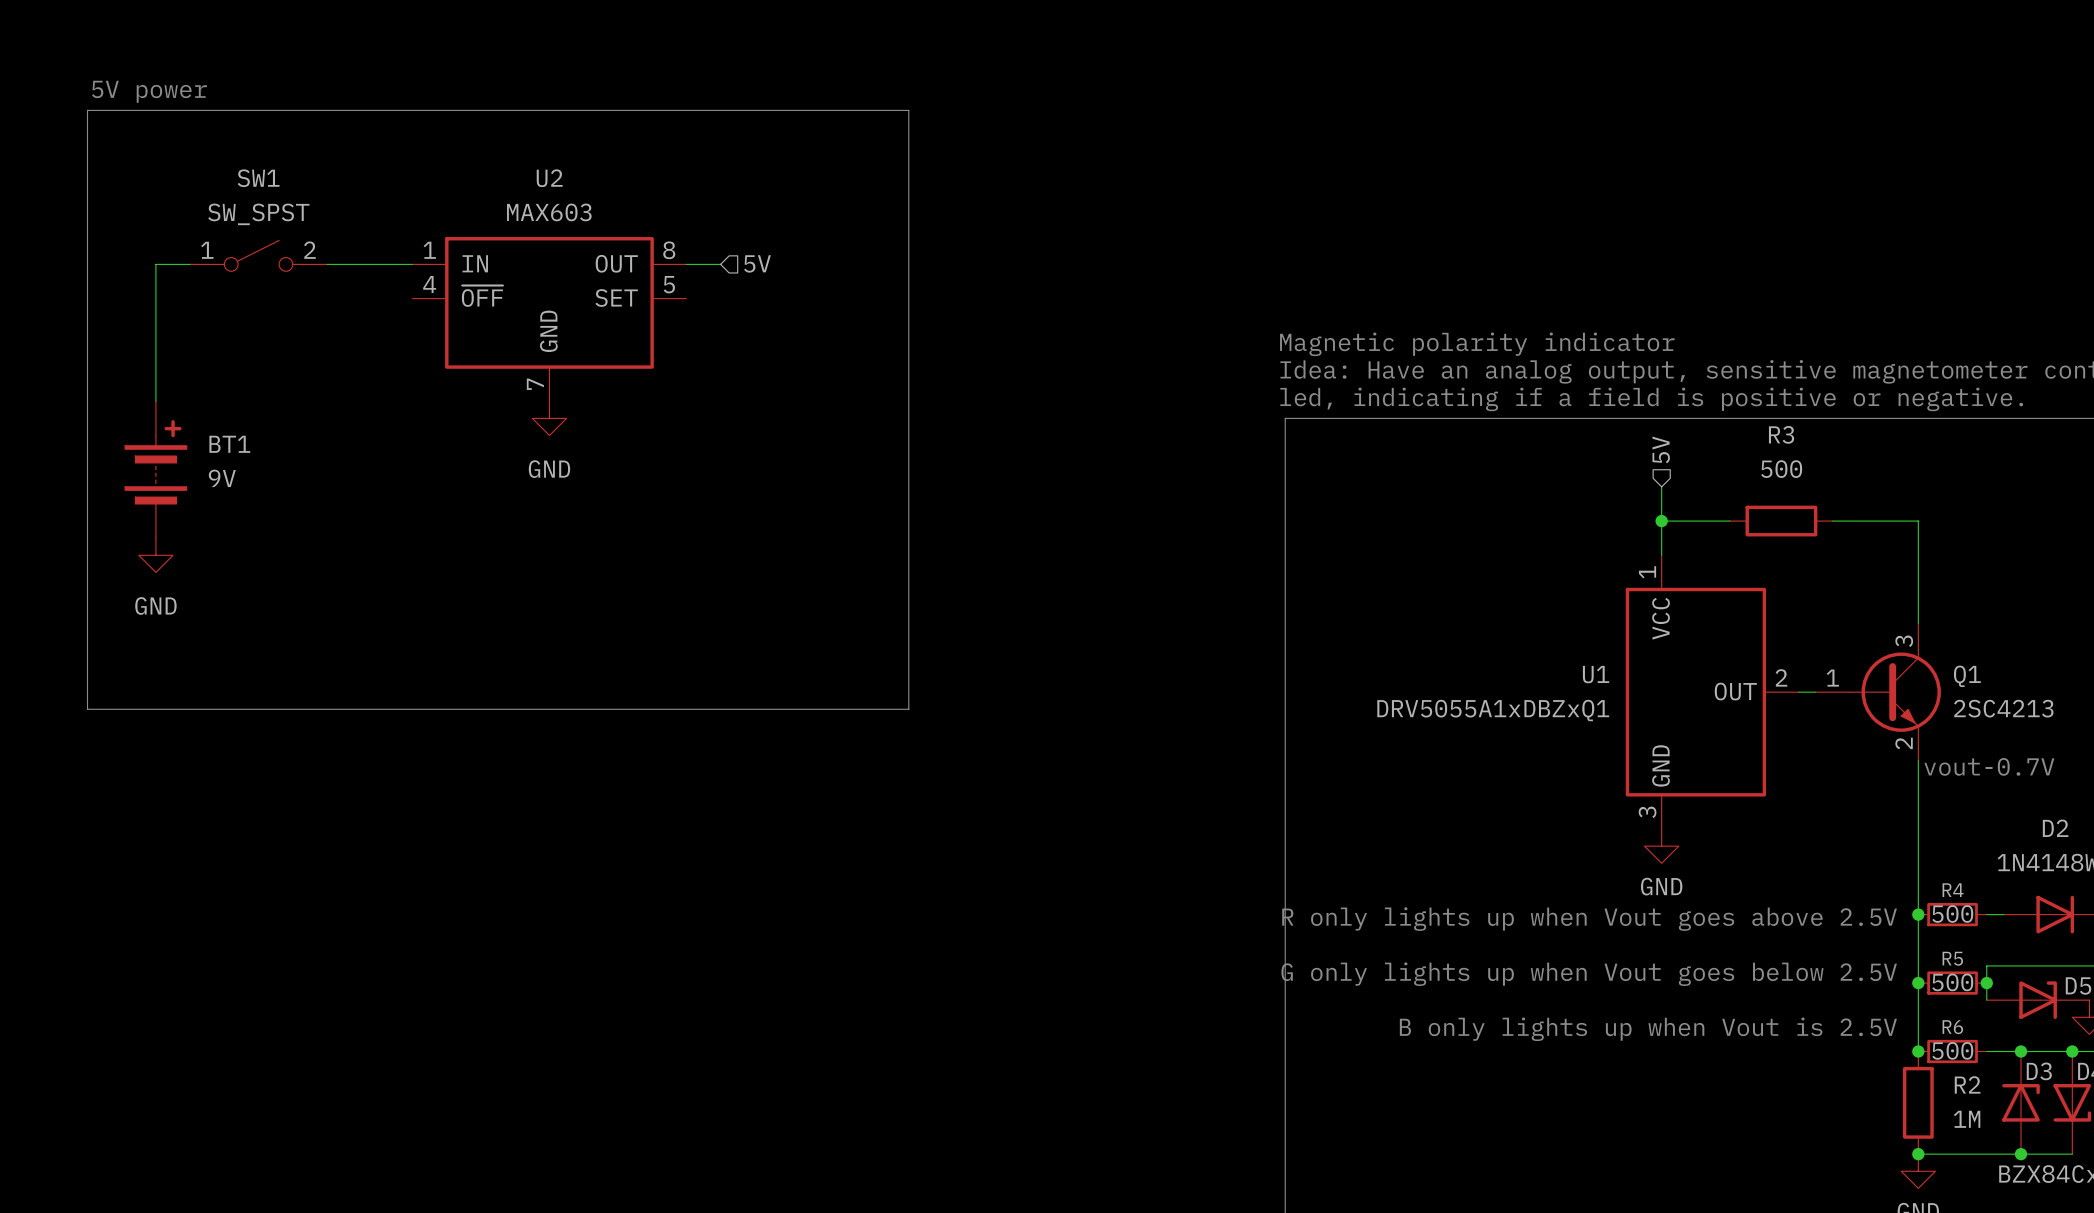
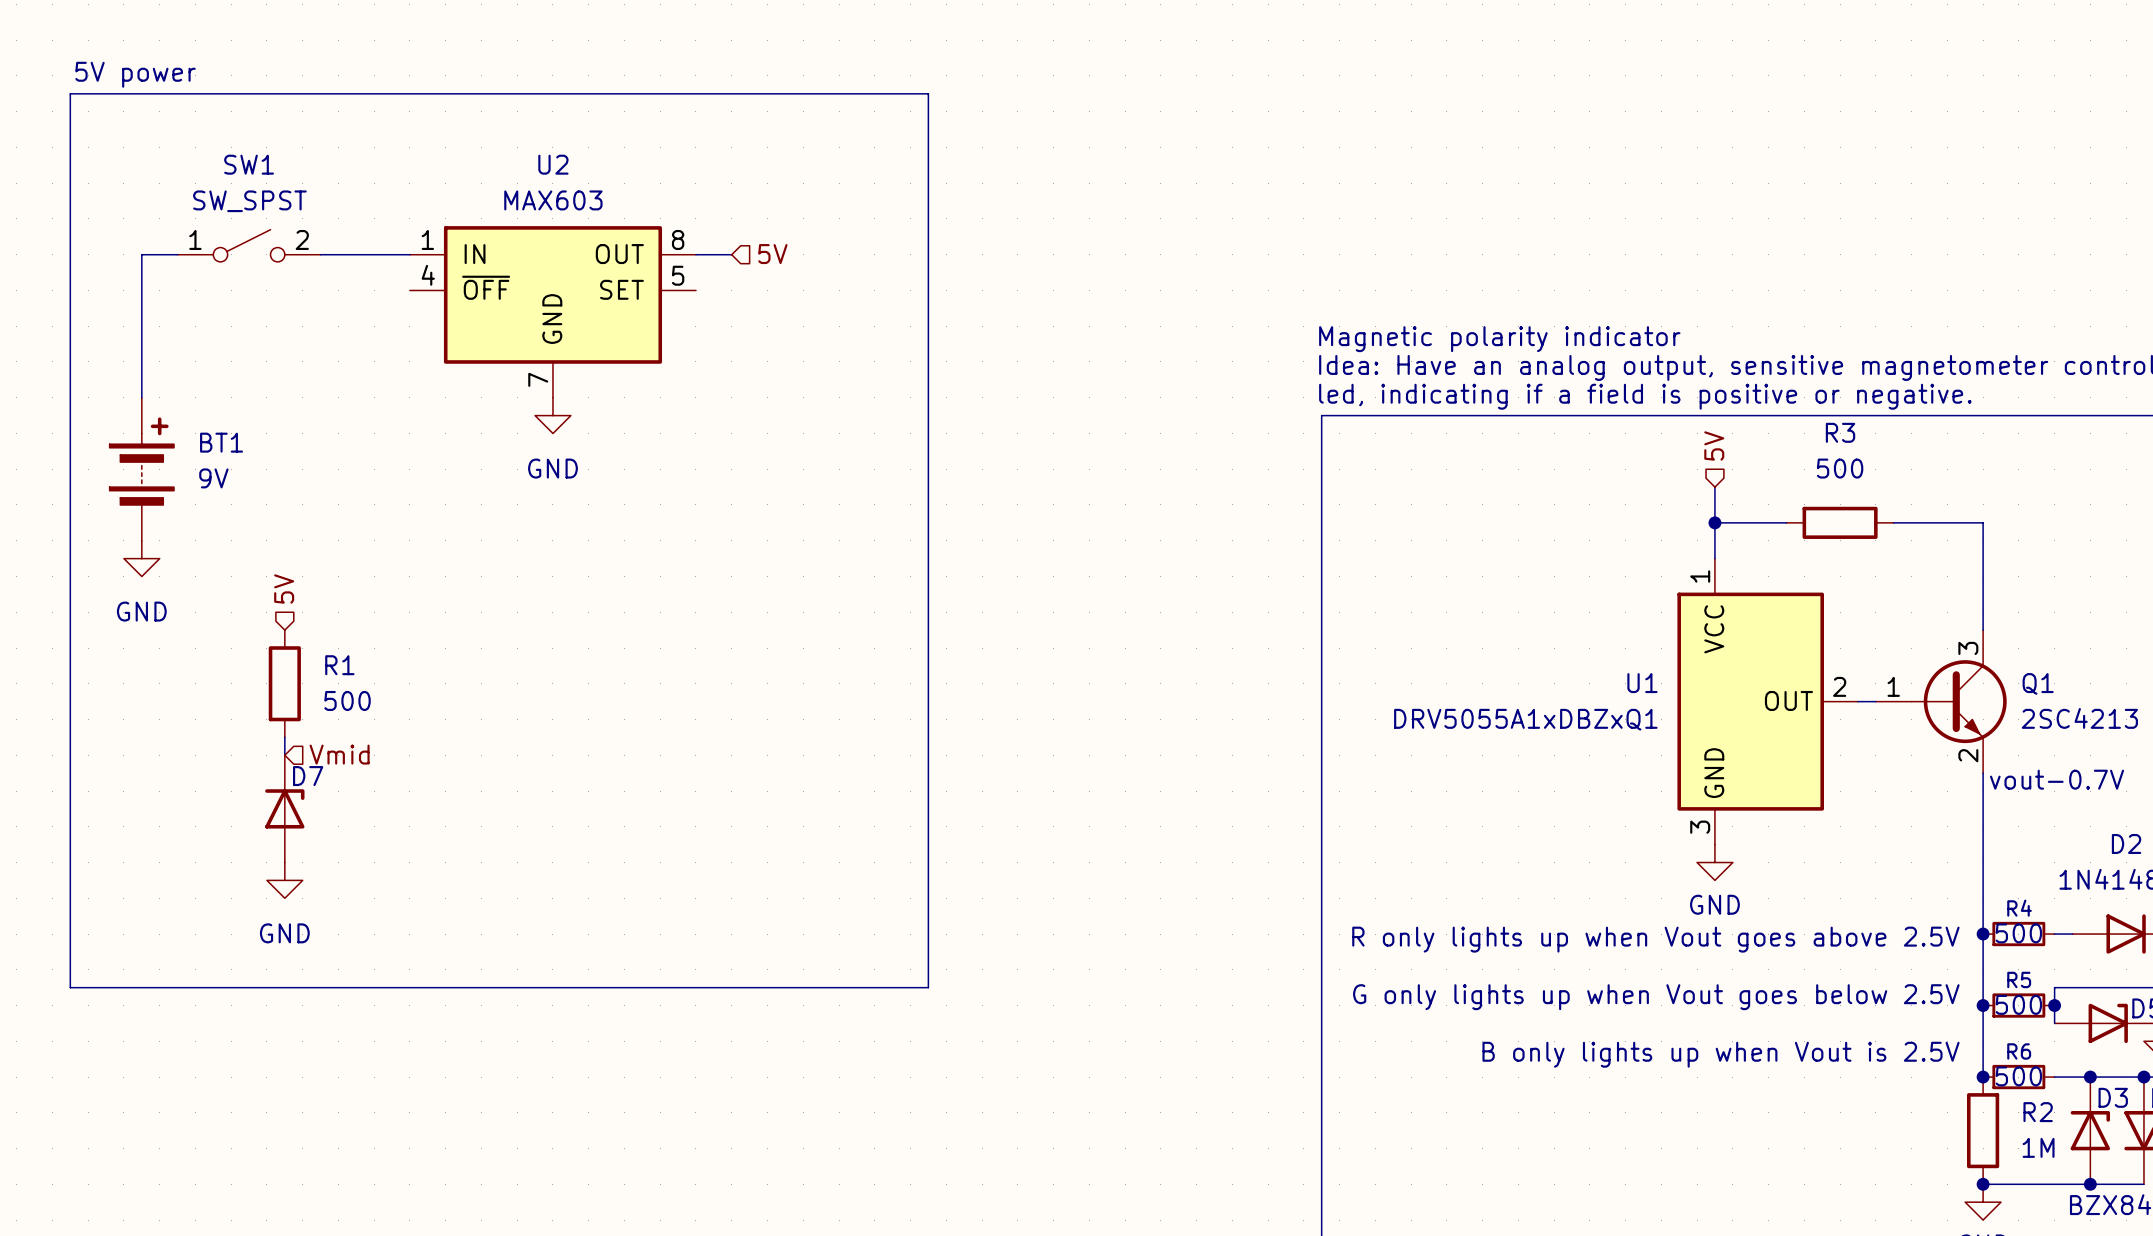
hierarchical label: none -> 5V (284, 588)
R1: none -> 500 (284, 683)
line: (87, 709) (908, 709) -> (70, 719) (70, 987) (928, 987) (928, 719)
wire: none -> (284, 737) (284, 755)
hierarchical label: none -> Vmid (339, 754)
D7: none -> (284, 808)
power symbol: none -> GND (284, 880)

